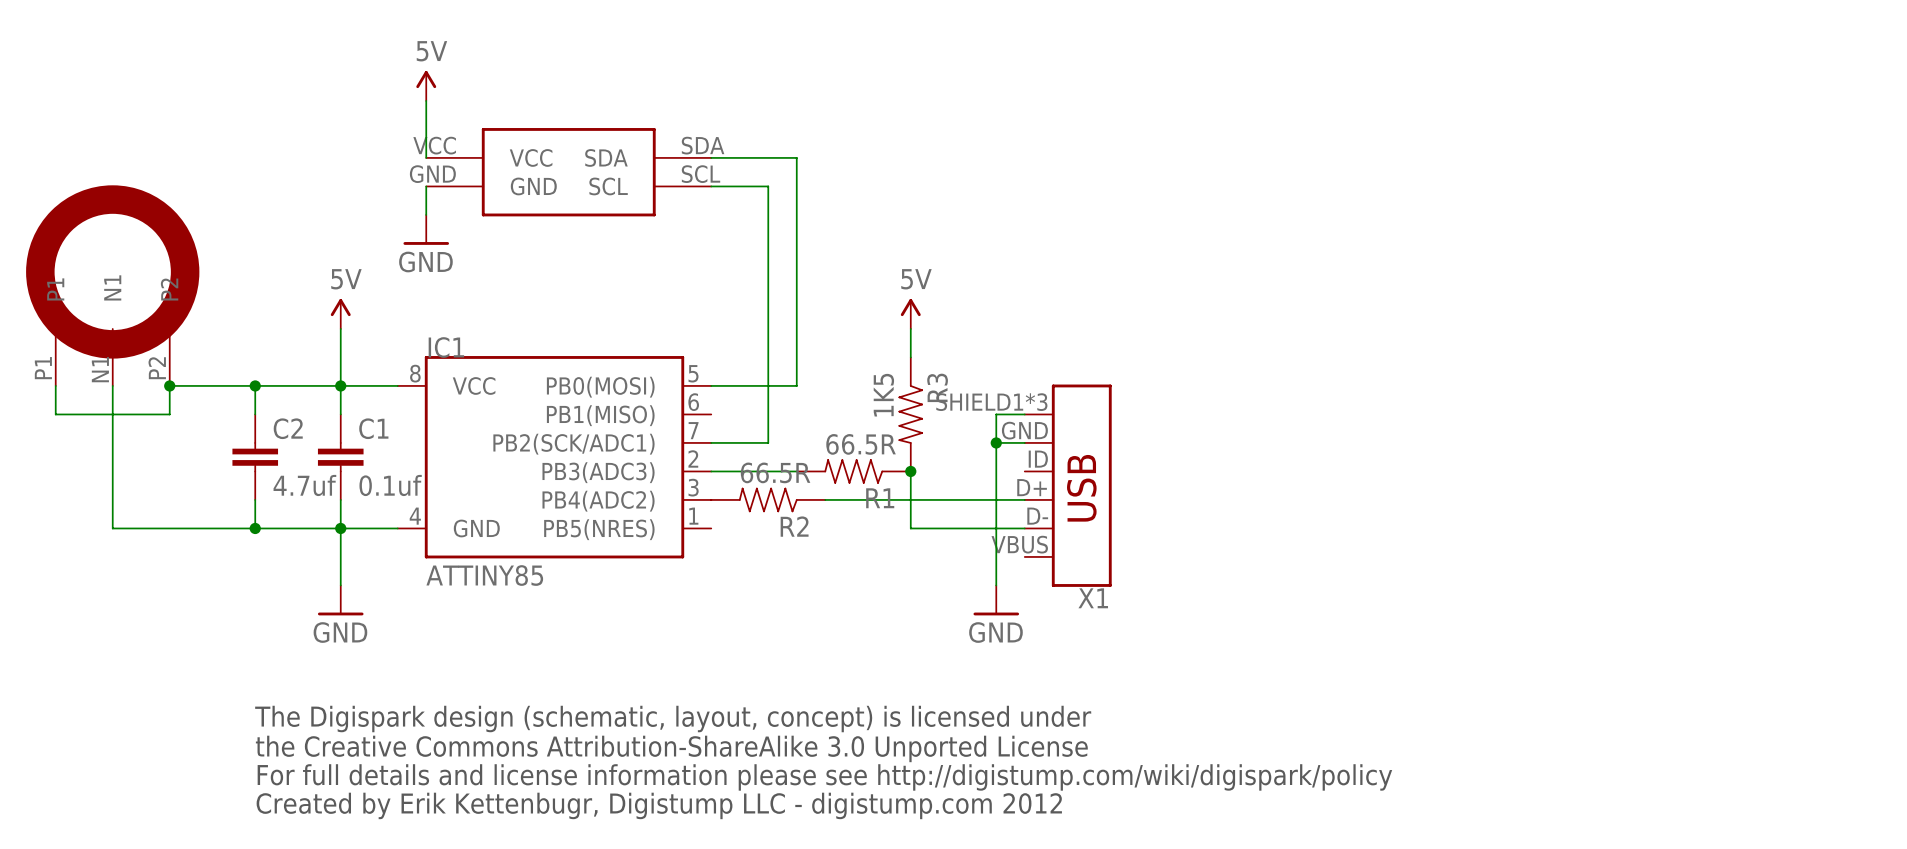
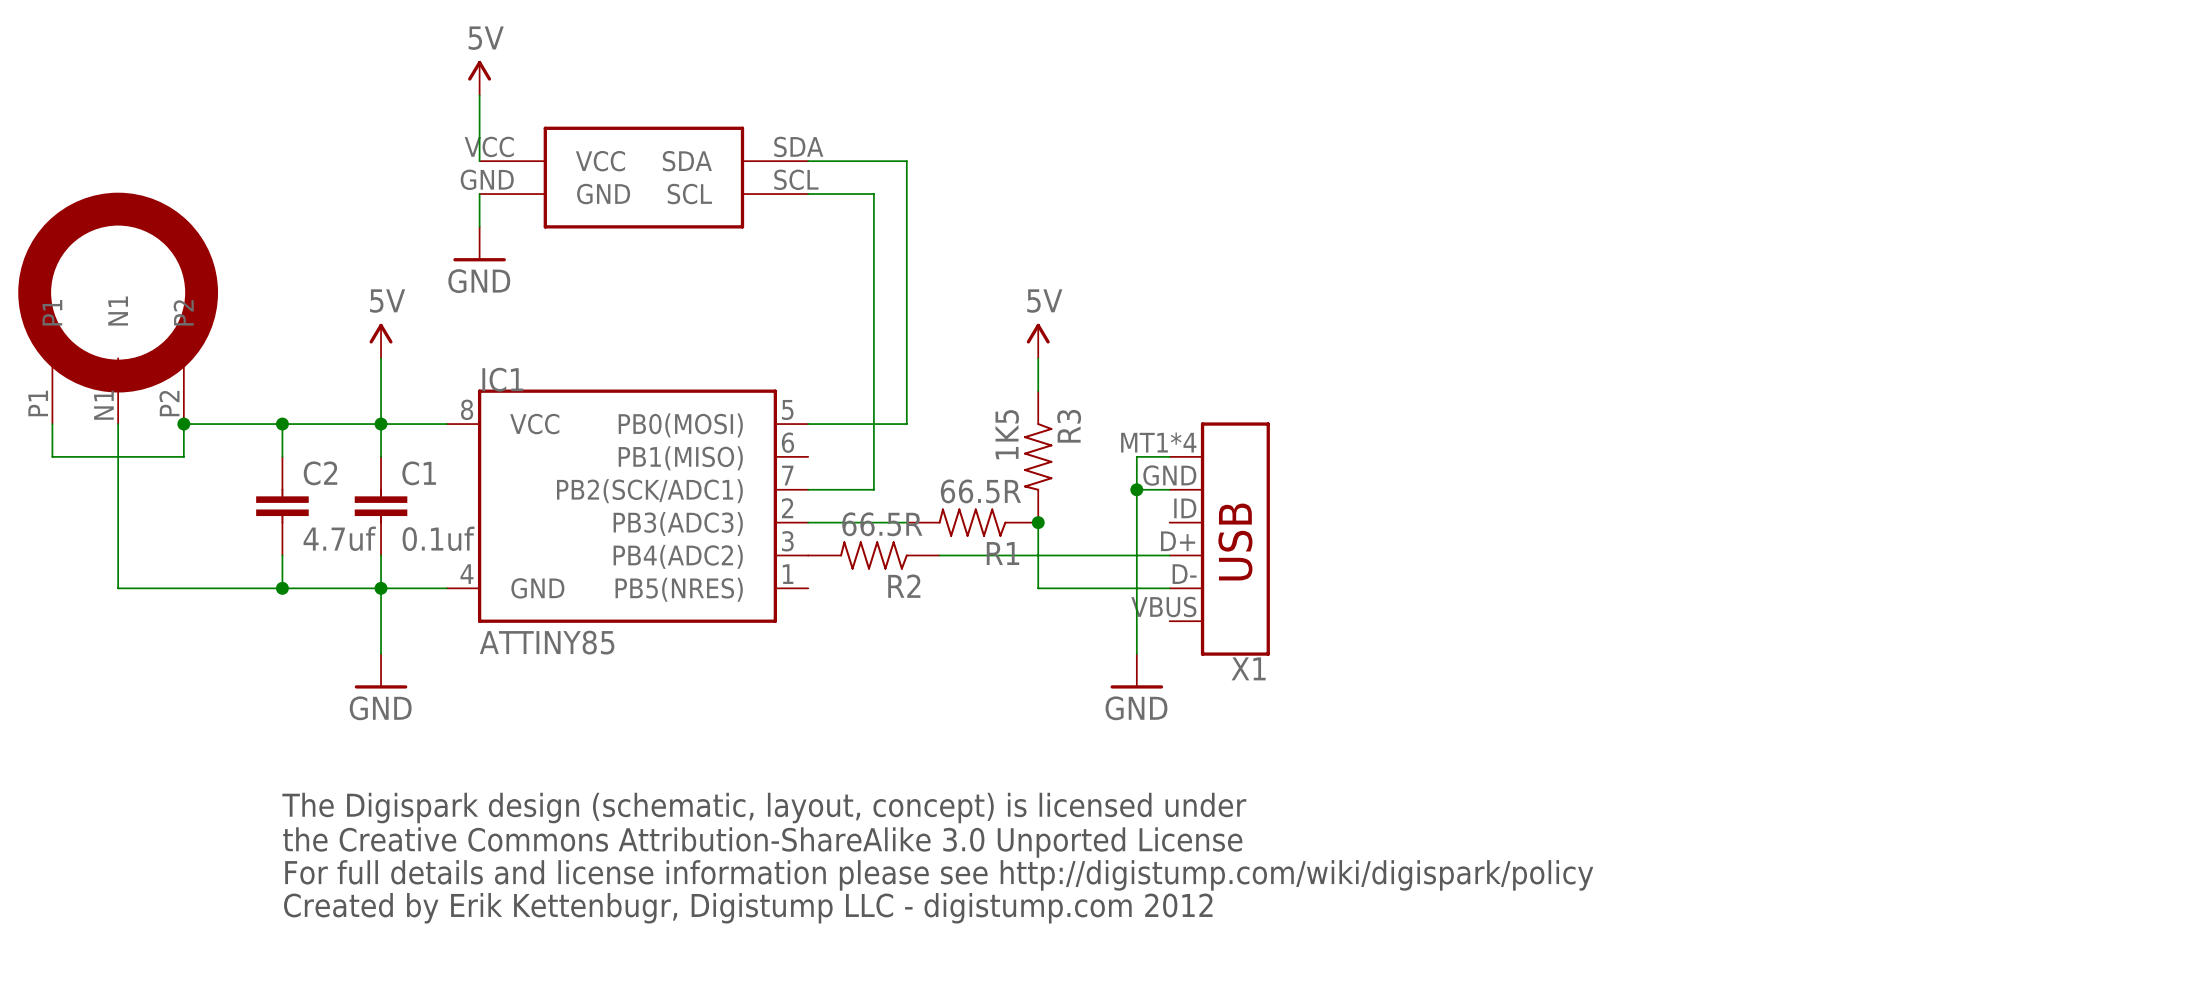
X1 pin number: SHIELD1*3 (991, 402) -> MT1*4 (1158, 442)

